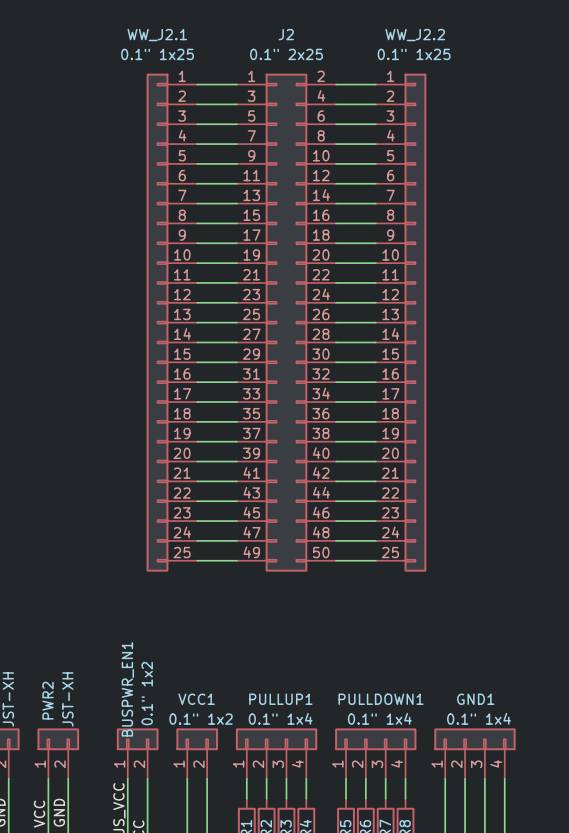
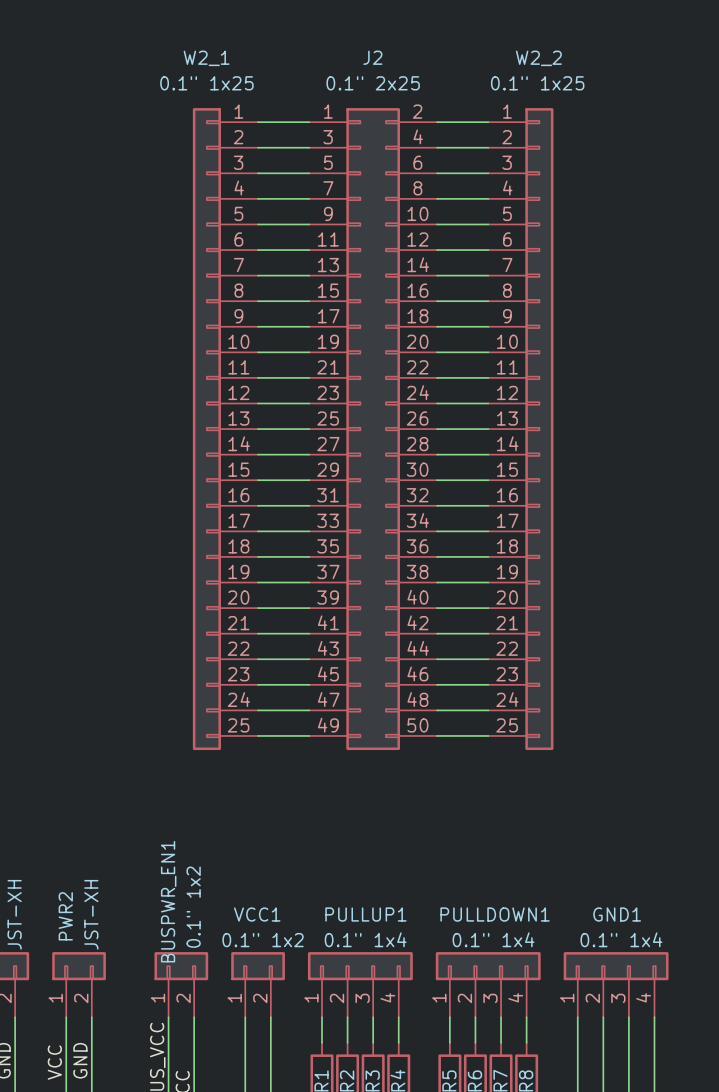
WW_J2.1 name: WW_J2.1 (157, 35) -> W2_1 (206, 58)
WW_J2.2 name: WW_J2.2 (415, 35) -> W2_2 (538, 58)

